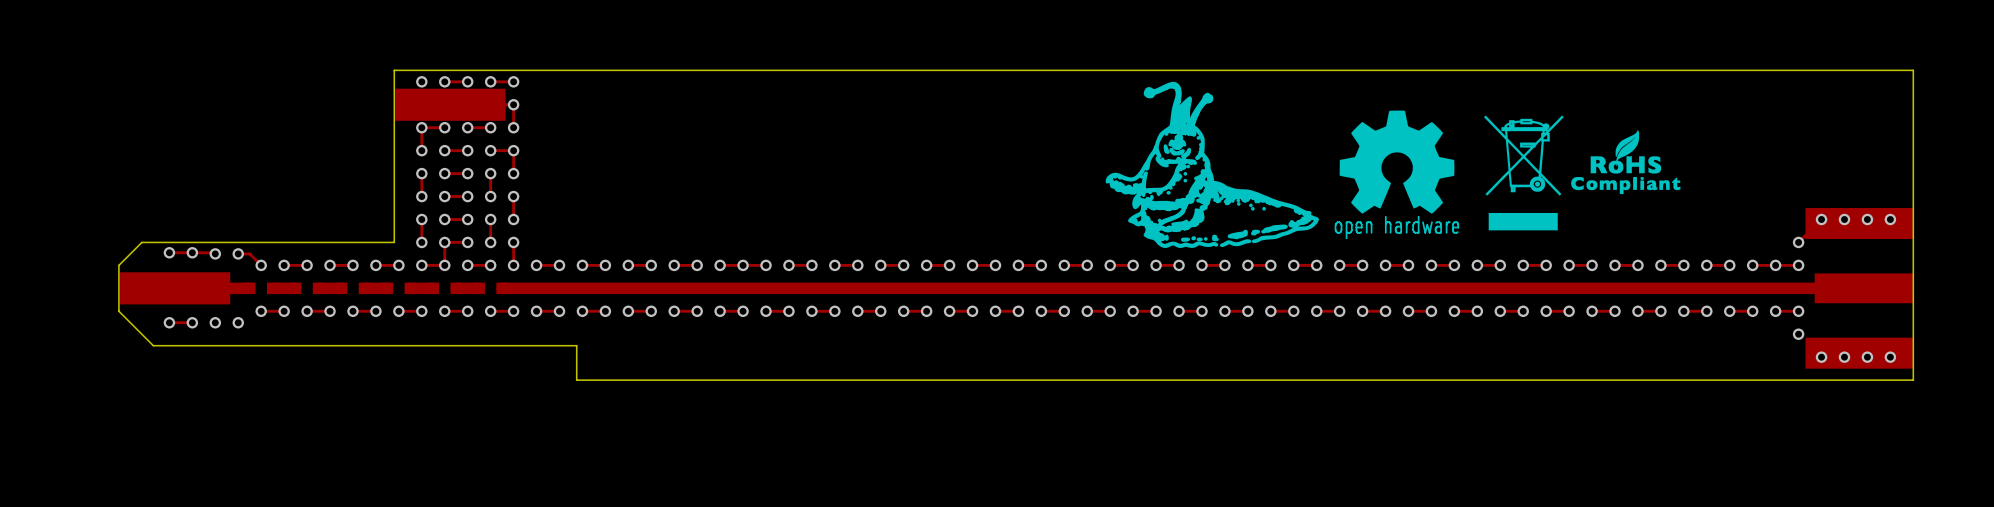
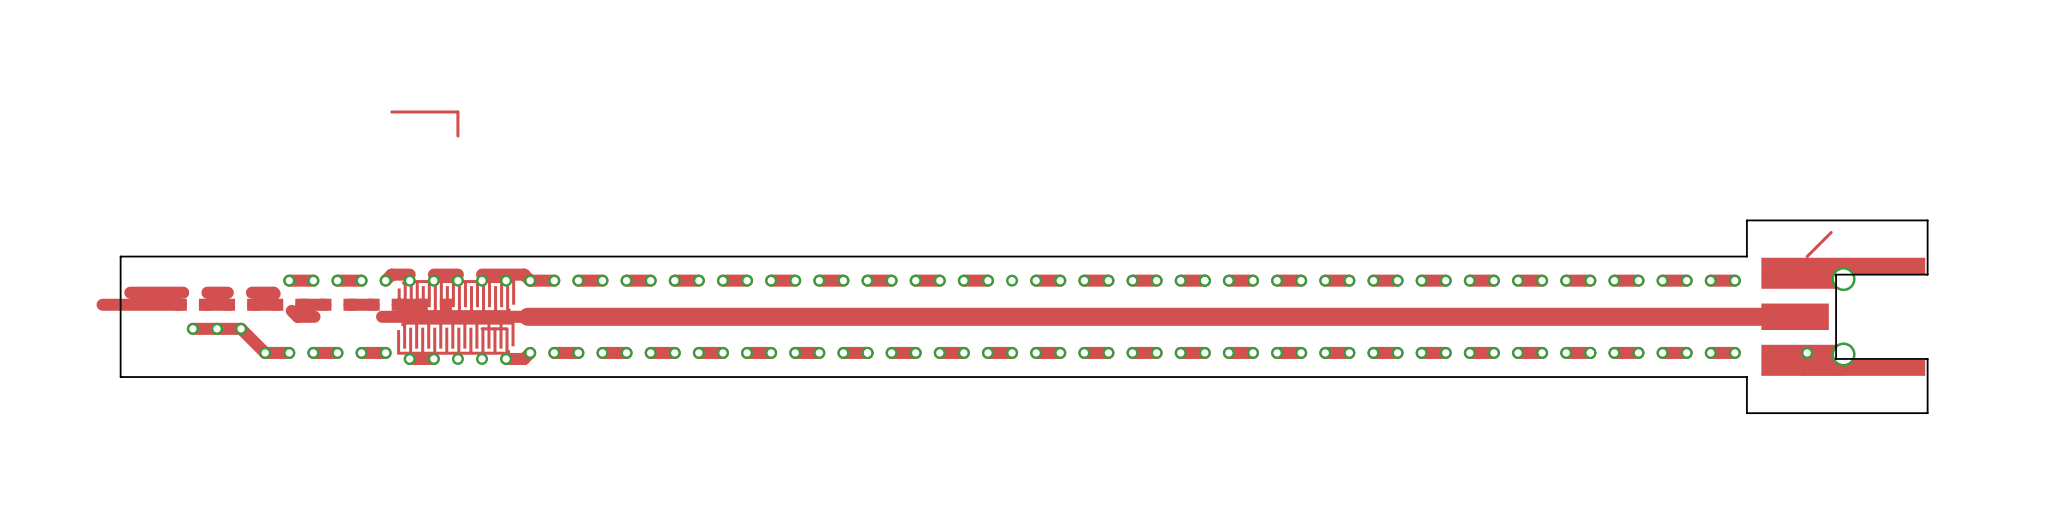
via: (421, 81) -> none
via: (444, 81) -> none
top track: (467, 81) (444, 81) -> none
via: (467, 81) -> none
via: (490, 81) -> none
top track: (513, 81) (490, 81) -> none
via: (513, 81) -> none
drawing: [1105, 81, 1681, 249] -> none
part: (450, 104) -> none
via: (513, 104) -> none
via: (421, 127) -> none
top track: (444, 127) (421, 127) (421, 150) -> none
via: (444, 127) -> none
via: (467, 127) -> none
top track: (490, 127) (467, 127) -> none
via: (490, 127) -> none
via: (513, 127) -> none
via: (421, 150) -> none
via: (444, 150) -> none
top track: (467, 150) (444, 150) -> none
via: (467, 150) -> none
top track: (490, 150) (513, 150) (513, 173) -> none
via: (490, 150) -> none
via: (513, 150) -> none
top track: (421, 173) (421, 196) -> none
via: (421, 173) -> none
via: (444, 173) -> none
top track: (467, 173) (444, 173) -> none
via: (467, 173) -> none
top track: (490, 173) (490, 196) -> none
via: (490, 173) -> none
via: (513, 173) -> none
via: (421, 196) -> none
via: (444, 196) -> none
top track: (467, 196) (444, 196) -> none
via: (467, 196) -> none
via: (490, 196) -> none
top track: (513, 196) (513, 219) -> none
via: (513, 196) -> none
board edge: (1913, 208) (1913, 70) (394, 70) (394, 242) -> (1927, 220) (1746, 220) (1746, 256) (332, 256)
top track: (421, 219) (421, 242) -> none
via: (421, 219) -> none
via: (444, 219) -> none
top track: (467, 219) (444, 219) -> none
via: (467, 219) -> none
top track: (490, 219) (490, 242) -> none
via: (490, 219) -> none
via: (513, 219) -> none
via: (1821, 219) -> none
via: (1844, 219) -> none
via: (1867, 219) -> none
via: (1890, 219) -> none
board edge: (192, 242) (141, 242) (118, 265) (118, 311) (153, 345) (576, 345) (576, 380) (1913, 380) -> (120, 256) (120, 377) (1746, 377) (1746, 413) (1927, 413) (1927, 401)
via: (421, 242) -> none
via: (444, 242) -> none
top track: (467, 242) (444, 242) (444, 265) (421, 265) -> none
via: (467, 242) -> none
via: (490, 242) -> none
top track: (513, 242) (513, 265) -> none
via: (513, 242) -> none
via: (1798, 242) -> none
top track: (169, 252) (215, 253) -> none
via: (169, 252) -> none
via: (192, 252) -> none
via: (215, 253) -> none
top track: (238, 253) (249, 253) (261, 265) -> none
via: (238, 253) -> none
top track: none -> (409, 274) (391, 274) (385, 280)
top track: none -> (482, 274) (524, 274) (530, 280)
board edge: (1913, 259) (1913, 339) -> (1927, 274) (1836, 274) (1836, 358) (1927, 358)
via: (261, 265) -> none
via: (284, 265) -> none
top track: (307, 265) (284, 265) -> none
via: (307, 265) -> none
via: (330, 265) -> none
top track: (352, 265) (330, 265) -> (289, 280) (313, 280)
top track: (398, 265) (375, 265) -> (337, 280) (361, 280)
top track: (490, 265) (467, 265) -> (457, 274) (433, 274)
top track width: thin (605, 265) (582, 265) -> thick (554, 280) (530, 280)
top track width: thin (651, 265) (628, 265) -> thick (602, 280) (578, 280)
top track width: thin (697, 265) (674, 265) -> thick (650, 280) (626, 280)
top track width: thin (743, 265) (720, 265) -> thick (698, 280) (674, 280)
top track: (766, 265) (743, 265) -> none
top track: (811, 265) (788, 265) -> (722, 280) (747, 280)
top track: (857, 265) (834, 265) -> (771, 280) (795, 280)
top track: (903, 265) (880, 265) -> (819, 280) (843, 280)
top track: (949, 265) (926, 265) -> (867, 280) (891, 280)
top track: (995, 265) (972, 265) -> (915, 280) (939, 280)
top track: (1041, 265) (1018, 265) -> (963, 280) (987, 280)
top track width: thin (1087, 265) (1064, 265) -> thick (1060, 280) (1036, 280)
top track width: thin (1133, 265) (1110, 265) -> thick (1108, 280) (1084, 280)
top track width: thin (1179, 265) (1156, 265) -> thick (1156, 280) (1132, 280)
top track width: thin (1224, 265) (1201, 265) -> thick (1204, 280) (1180, 280)
top track width: thin (1270, 265) (1247, 265) -> thick (1253, 280) (1228, 280)
top track width: thin (1316, 265) (1293, 265) -> thick (1301, 280) (1277, 280)
top track width: thin (1362, 265) (1339, 265) -> thick (1349, 280) (1325, 280)
top track width: thin (1408, 265) (1385, 265) -> thick (1397, 280) (1373, 280)
top track width: thin (1454, 265) (1431, 265) -> thick (1445, 280) (1421, 280)
top track width: thin (1500, 265) (1477, 265) -> thick (1493, 280) (1469, 280)
top track width: thin (1546, 265) (1523, 265) -> thick (1542, 280) (1518, 280)
top track width: thin (1592, 265) (1569, 265) -> thick (1590, 280) (1566, 280)
top track width: thin (1637, 265) (1615, 265) -> thick (1638, 280) (1614, 280)
top track width: thin (1683, 265) (1660, 265) -> thick (1686, 280) (1662, 280)
top track width: thin (1729, 265) (1706, 265) -> thick (1734, 280) (1710, 280)
via: (1752, 265) -> none
via: (1775, 265) -> none
top track: (1798, 265) (1752, 265) -> none
via: (1798, 265) -> none
top track: none -> (183, 292) (130, 292)
top track: none -> (227, 292) (207, 292)
top track: none -> (251, 292) (274, 293)
part: none -> (456, 296)
part: (175, 288) -> none
part: (1859, 288) -> none
top track: (1863, 288) (502, 288) -> none
top track: none -> (291, 310) (297, 316) (314, 316)
top track: none -> (1795, 316) (382, 316)
part: none -> (1843, 316)
top track: none -> (216, 328) (241, 328) (265, 352) (289, 352)
top track width: thin (284, 311) (261, 311) -> thick (216, 328) (192, 328)
top track: (330, 311) (307, 311) -> none
via: (330, 311) -> none
via: (352, 311) -> none
top track: (375, 311) (352, 311) -> none
via: (375, 311) -> none
via: (398, 311) -> none
top track: (421, 311) (398, 311) -> (337, 352) (313, 352)
via: (421, 311) -> none
via: (444, 311) -> none
top track: (467, 311) (444, 311) -> (385, 352) (361, 352)
via: (467, 311) -> none
via: (490, 311) -> none
top track: (513, 311) (490, 311) -> (433, 358) (409, 358)
via: (513, 311) -> none
via: (536, 311) -> none
via: (559, 311) -> none
via: (582, 311) -> none
top track: (605, 311) (582, 311) -> none
via: (605, 311) -> none
via: (628, 311) -> none
top track: (651, 311) (628, 311) -> (578, 352) (554, 352)
via: (651, 311) -> none
via: (674, 311) -> none
top track: (697, 311) (674, 311) -> (626, 352) (602, 352)
via: (697, 311) -> none
via: (720, 311) -> none
top track: (743, 311) (720, 311) -> (674, 352) (650, 352)
via: (743, 311) -> none
via: (766, 311) -> none
top track: (788, 311) (766, 311) -> (722, 352) (698, 352)
via: (788, 311) -> none
via: (811, 311) -> none
top track: (834, 311) (811, 311) -> (771, 352) (747, 352)
via: (834, 311) -> none
via: (857, 311) -> none
top track: (880, 311) (857, 311) -> (819, 352) (795, 352)
via: (880, 311) -> none
via: (903, 311) -> none
top track: (926, 311) (903, 311) -> (867, 352) (843, 352)
via: (926, 311) -> none
via: (949, 311) -> none
top track: (972, 311) (949, 311) -> (915, 352) (891, 352)
via: (972, 311) -> none
via: (995, 311) -> none
top track: (1018, 311) (995, 311) -> (963, 352) (939, 352)
via: (1018, 311) -> none
via: (1041, 311) -> none
top track: (1064, 311) (1041, 311) -> (1012, 352) (987, 352)
via: (1064, 311) -> none
via: (1087, 311) -> none
top track: (1110, 311) (1087, 311) -> (1060, 352) (1036, 352)
via: (1110, 311) -> none
via: (1133, 311) -> none
top track: (1156, 311) (1133, 311) -> (1108, 352) (1084, 352)
via: (1156, 311) -> none
via: (1179, 311) -> none
top track: (1201, 311) (1179, 311) -> (1156, 352) (1132, 352)
via: (1201, 311) -> none
via: (1224, 311) -> none
top track: (1247, 311) (1224, 311) -> (1204, 352) (1180, 352)
via: (1247, 311) -> none
via: (1270, 311) -> none
top track: (1293, 311) (1270, 311) -> (1253, 352) (1228, 352)
via: (1293, 311) -> none
via: (1316, 311) -> none
top track: (1339, 311) (1316, 311) -> (1301, 352) (1277, 352)
via: (1339, 311) -> none
via: (1362, 311) -> none
top track: (1385, 311) (1362, 311) -> (1349, 352) (1325, 352)
via: (1385, 311) -> none
via: (1408, 311) -> none
top track: (1431, 311) (1408, 311) -> (1397, 352) (1373, 352)
via: (1431, 311) -> none
via: (1454, 311) -> none
top track: (1477, 311) (1454, 311) -> (1445, 352) (1421, 352)
via: (1477, 311) -> none
via: (1500, 311) -> none
top track: (1523, 311) (1500, 311) -> (1493, 352) (1469, 352)
via: (1523, 311) -> none
via: (1546, 311) -> none
top track: (1569, 311) (1546, 311) -> (1542, 352) (1518, 352)
via: (1569, 311) -> none
via: (1592, 311) -> none
top track: (1615, 311) (1592, 311) -> (1590, 352) (1566, 352)
via: (1615, 311) -> none
via: (1637, 311) -> none
top track: (1660, 311) (1637, 311) -> (1638, 352) (1614, 352)
via: (1660, 311) -> none
via: (1683, 311) -> none
top track: (1706, 311) (1683, 311) -> (1686, 352) (1662, 352)
via: (1706, 311) -> none
via: (1729, 311) -> none
top track: (1752, 311) (1729, 311) -> (1734, 352) (1710, 352)
via: (1752, 311) -> none
via: (1775, 311) -> none
top track: (1798, 311) (1775, 311) -> none
via: (1798, 311) -> none
part: none -> (455, 338)
via: (169, 322) -> none
top track: (192, 322) (169, 322) -> none
via: (192, 322) -> none
via: (215, 322) -> none
via: (238, 322) -> none
via: none -> (265, 352)
via: none -> (289, 352)
via: none -> (313, 352)
via: none -> (337, 352)
via: none -> (361, 352)
via: none -> (385, 352)
top track: none -> (530, 352) (524, 358) (506, 358) (508, 356)
via: none -> (530, 352)
via: none -> (554, 352)
via: none -> (578, 352)
via: none -> (602, 352)
via: none -> (626, 352)
via: none -> (650, 352)
via: none -> (674, 352)
via: none -> (698, 352)
via: none -> (722, 352)
via: none -> (747, 352)
via: none -> (771, 352)
via: none -> (795, 352)
via: none -> (819, 352)
via: none -> (843, 352)
via: none -> (867, 352)
via: none -> (891, 352)
via: none -> (915, 352)
via: none -> (939, 352)
via: none -> (963, 352)
via: none -> (987, 352)
via: none -> (1012, 352)
via: none -> (1036, 352)
via: none -> (1060, 352)
via: none -> (1084, 352)
via: none -> (1108, 352)
via: none -> (1132, 352)
via: none -> (1156, 352)
via: none -> (1180, 352)
via: none -> (1204, 352)
via: none -> (1228, 352)
via: none -> (1253, 352)
via: none -> (1277, 352)
via: none -> (1301, 352)
via: none -> (1325, 352)
via: none -> (1349, 352)
via: none -> (1373, 352)
via: none -> (1397, 352)
via: none -> (1421, 352)
via: none -> (1445, 352)
via: none -> (1469, 352)
via: none -> (1493, 352)
via: none -> (1518, 352)
via: none -> (1542, 352)
via: none -> (1566, 352)
via: none -> (1590, 352)
via: none -> (1614, 352)
via: none -> (1638, 352)
via: none -> (1662, 352)
via: none -> (1686, 352)
via: none -> (1710, 352)
via: none -> (1734, 352)
via: none -> (409, 358)
via: none -> (433, 358)
via: none -> (457, 358)
via: none -> (482, 358)
via: none -> (506, 358)
via: (1821, 357) -> none
via: (1844, 357) -> none
via: (1867, 357) -> none
via: (1890, 357) -> none

